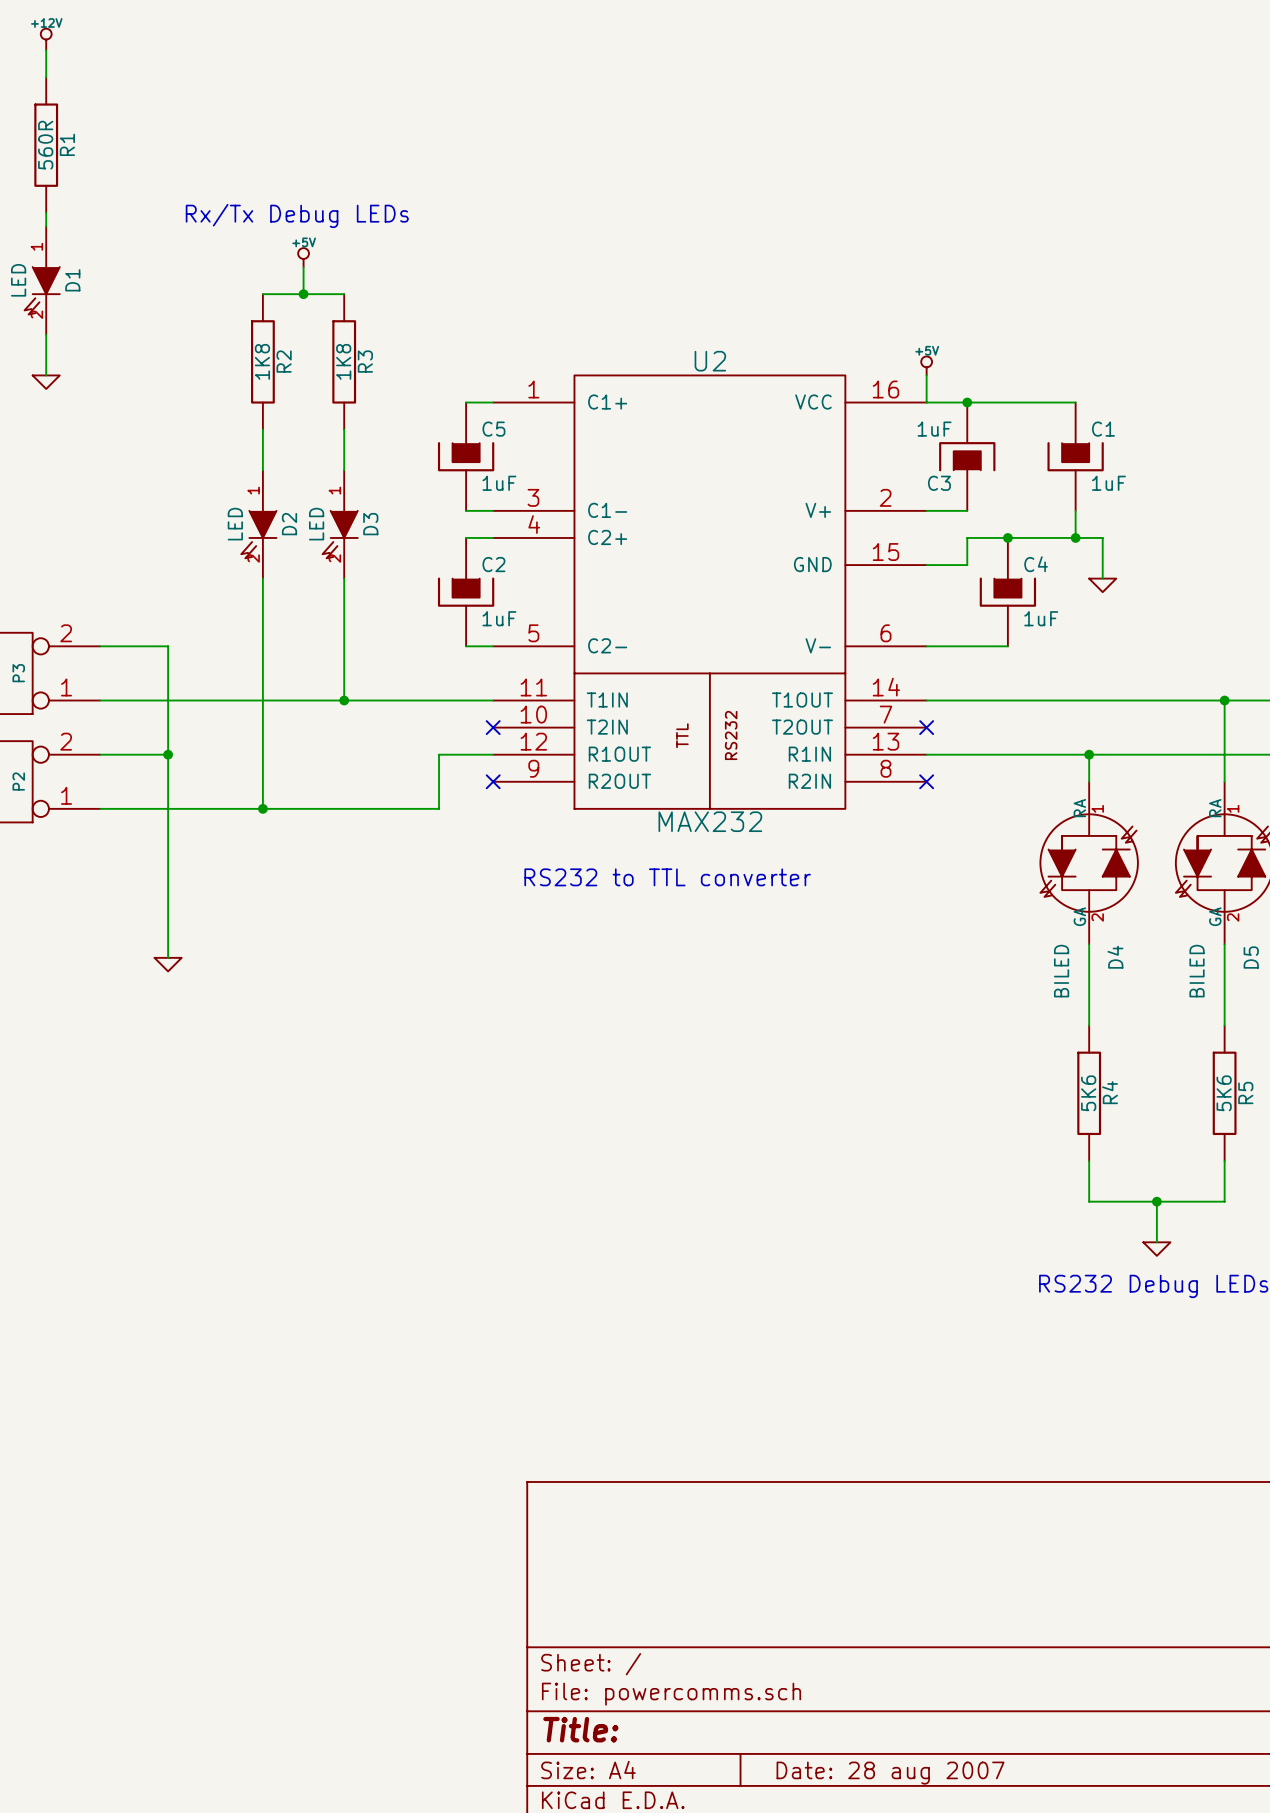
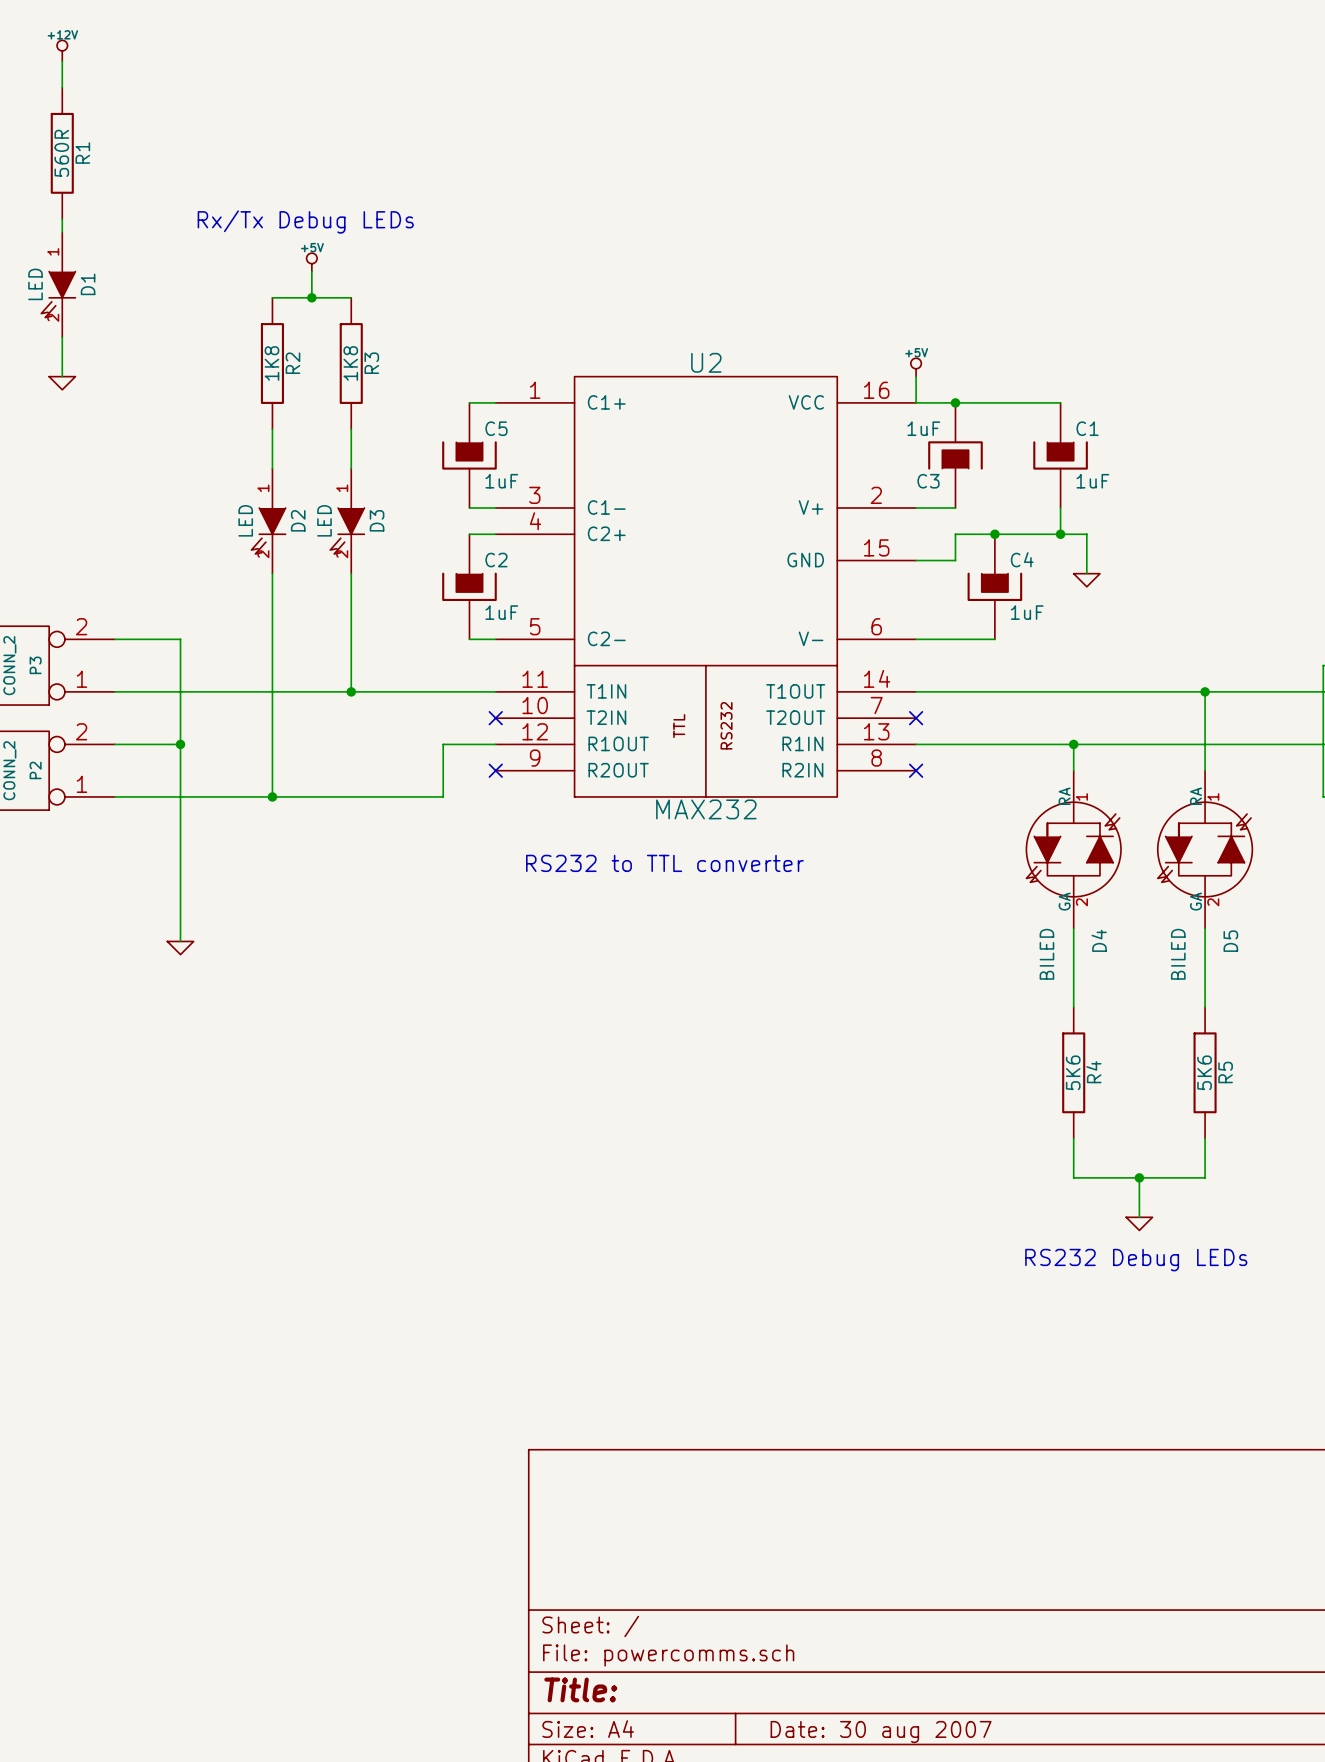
title block: Date: 28 aug 2007 (890, 1773) -> Date: 30 aug 2007 (881, 1732)

